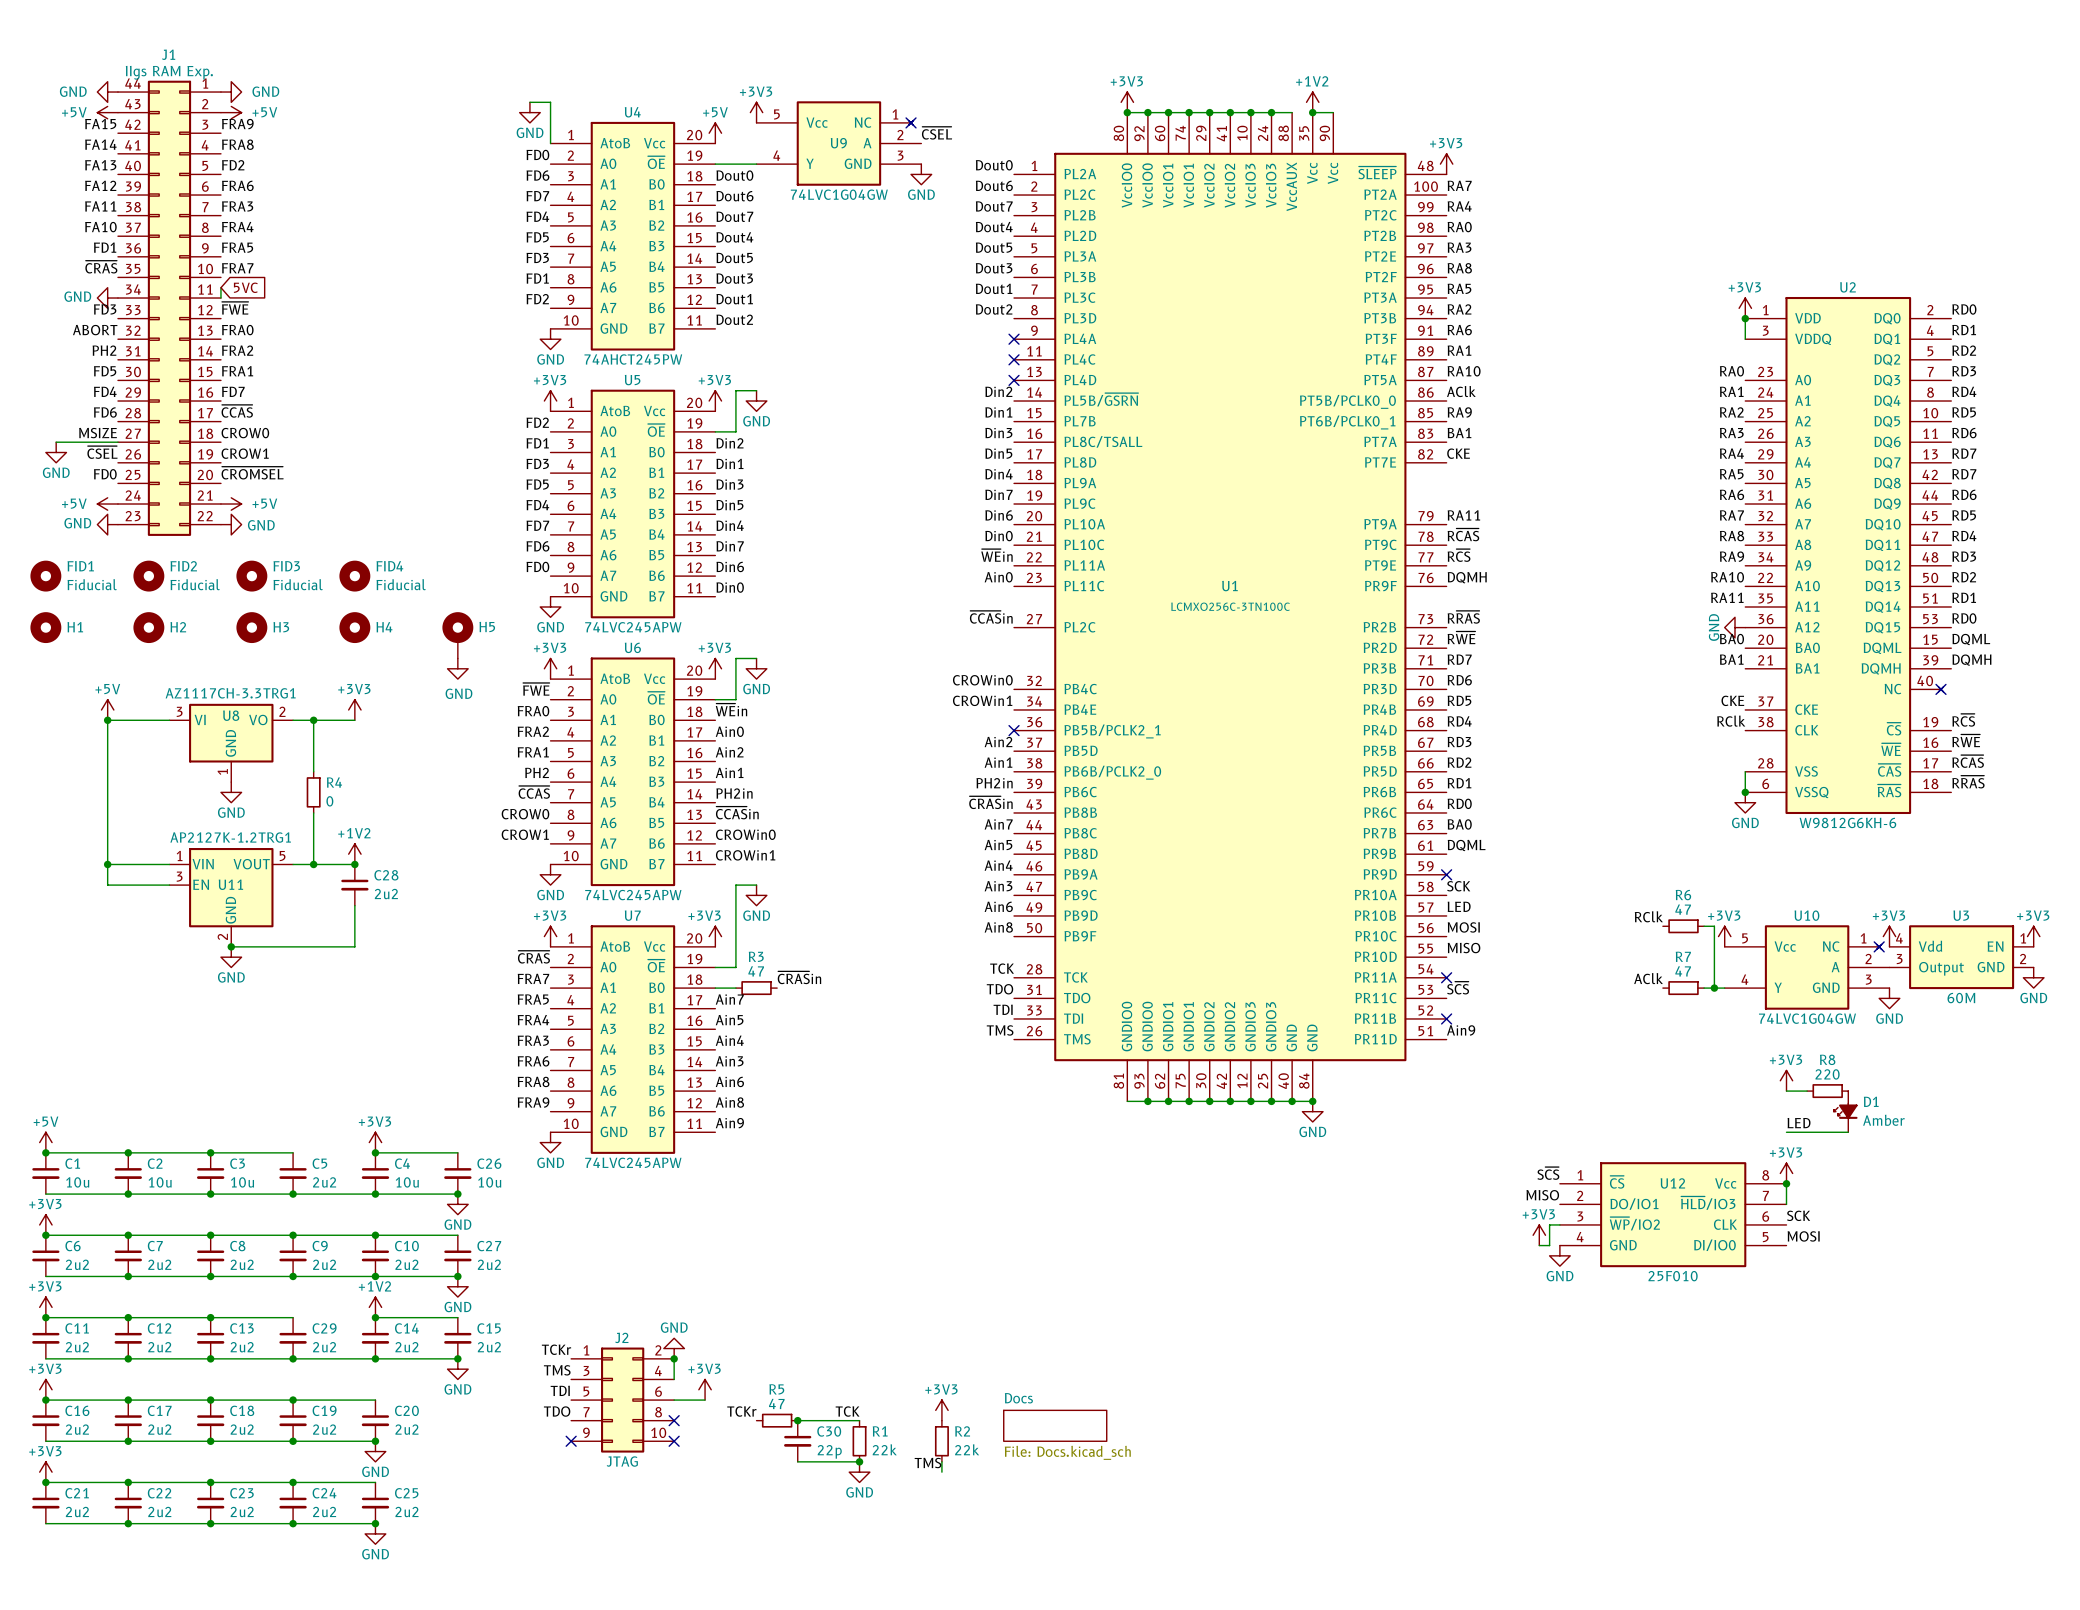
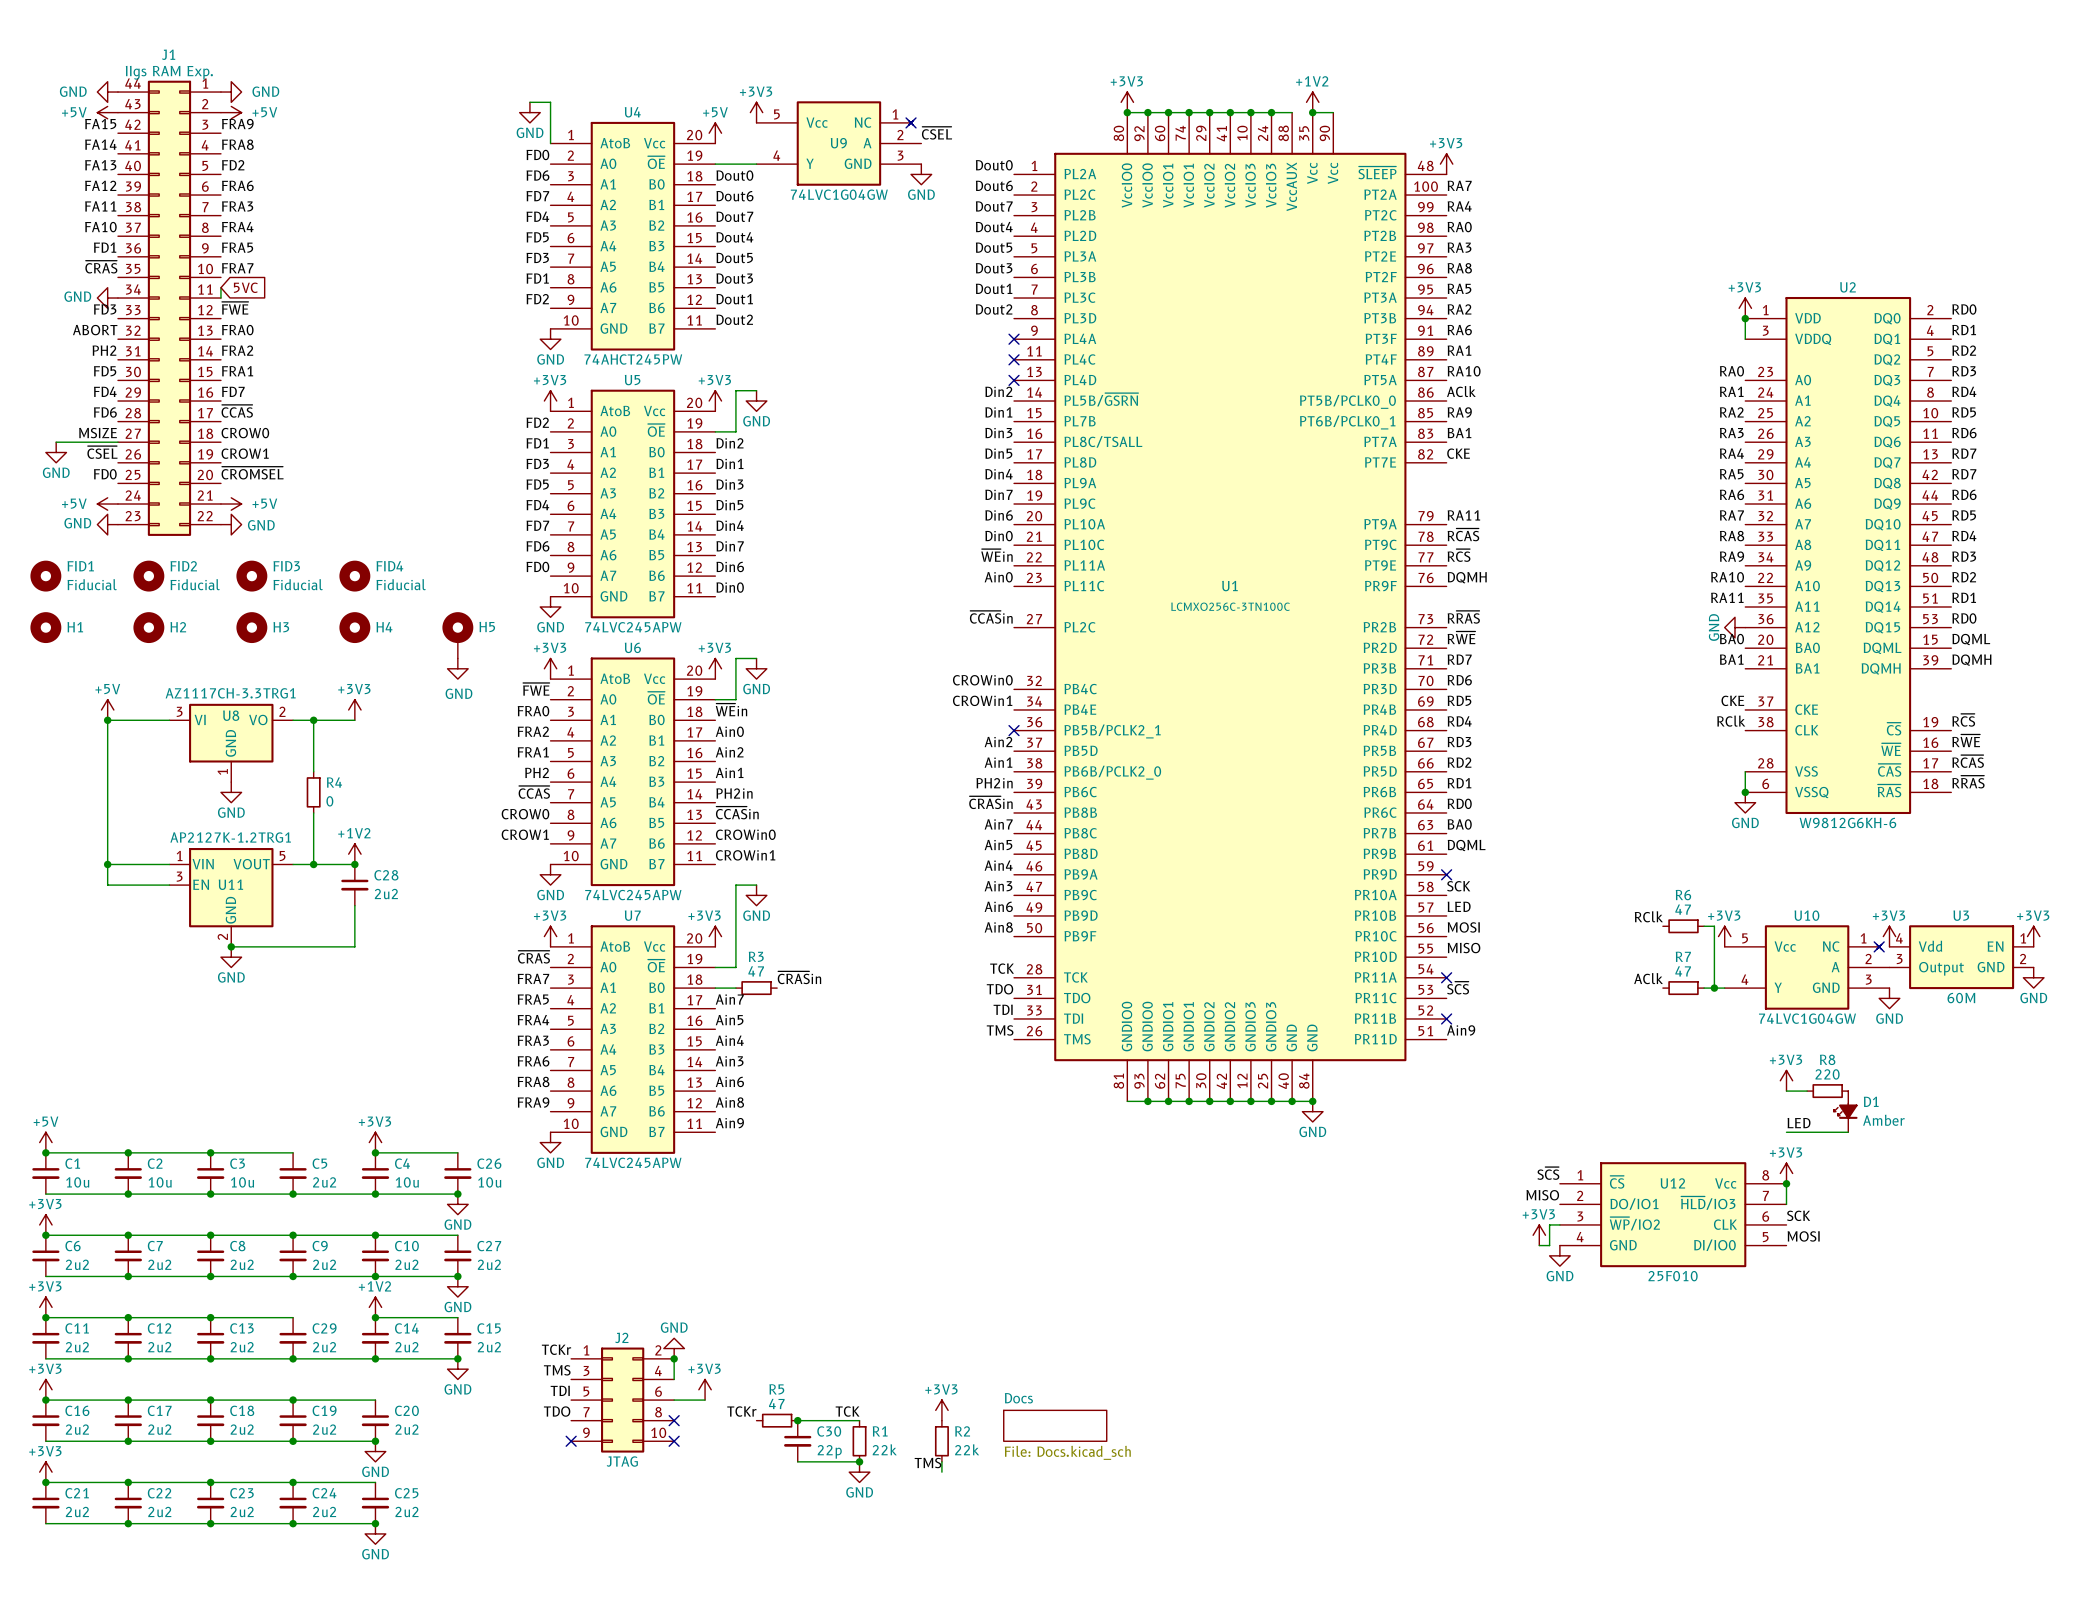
U2 symbol: [1745, 296, 1952, 815] -> [1745, 296, 1952, 815]
no-connect mark: (1940, 689) -> none

